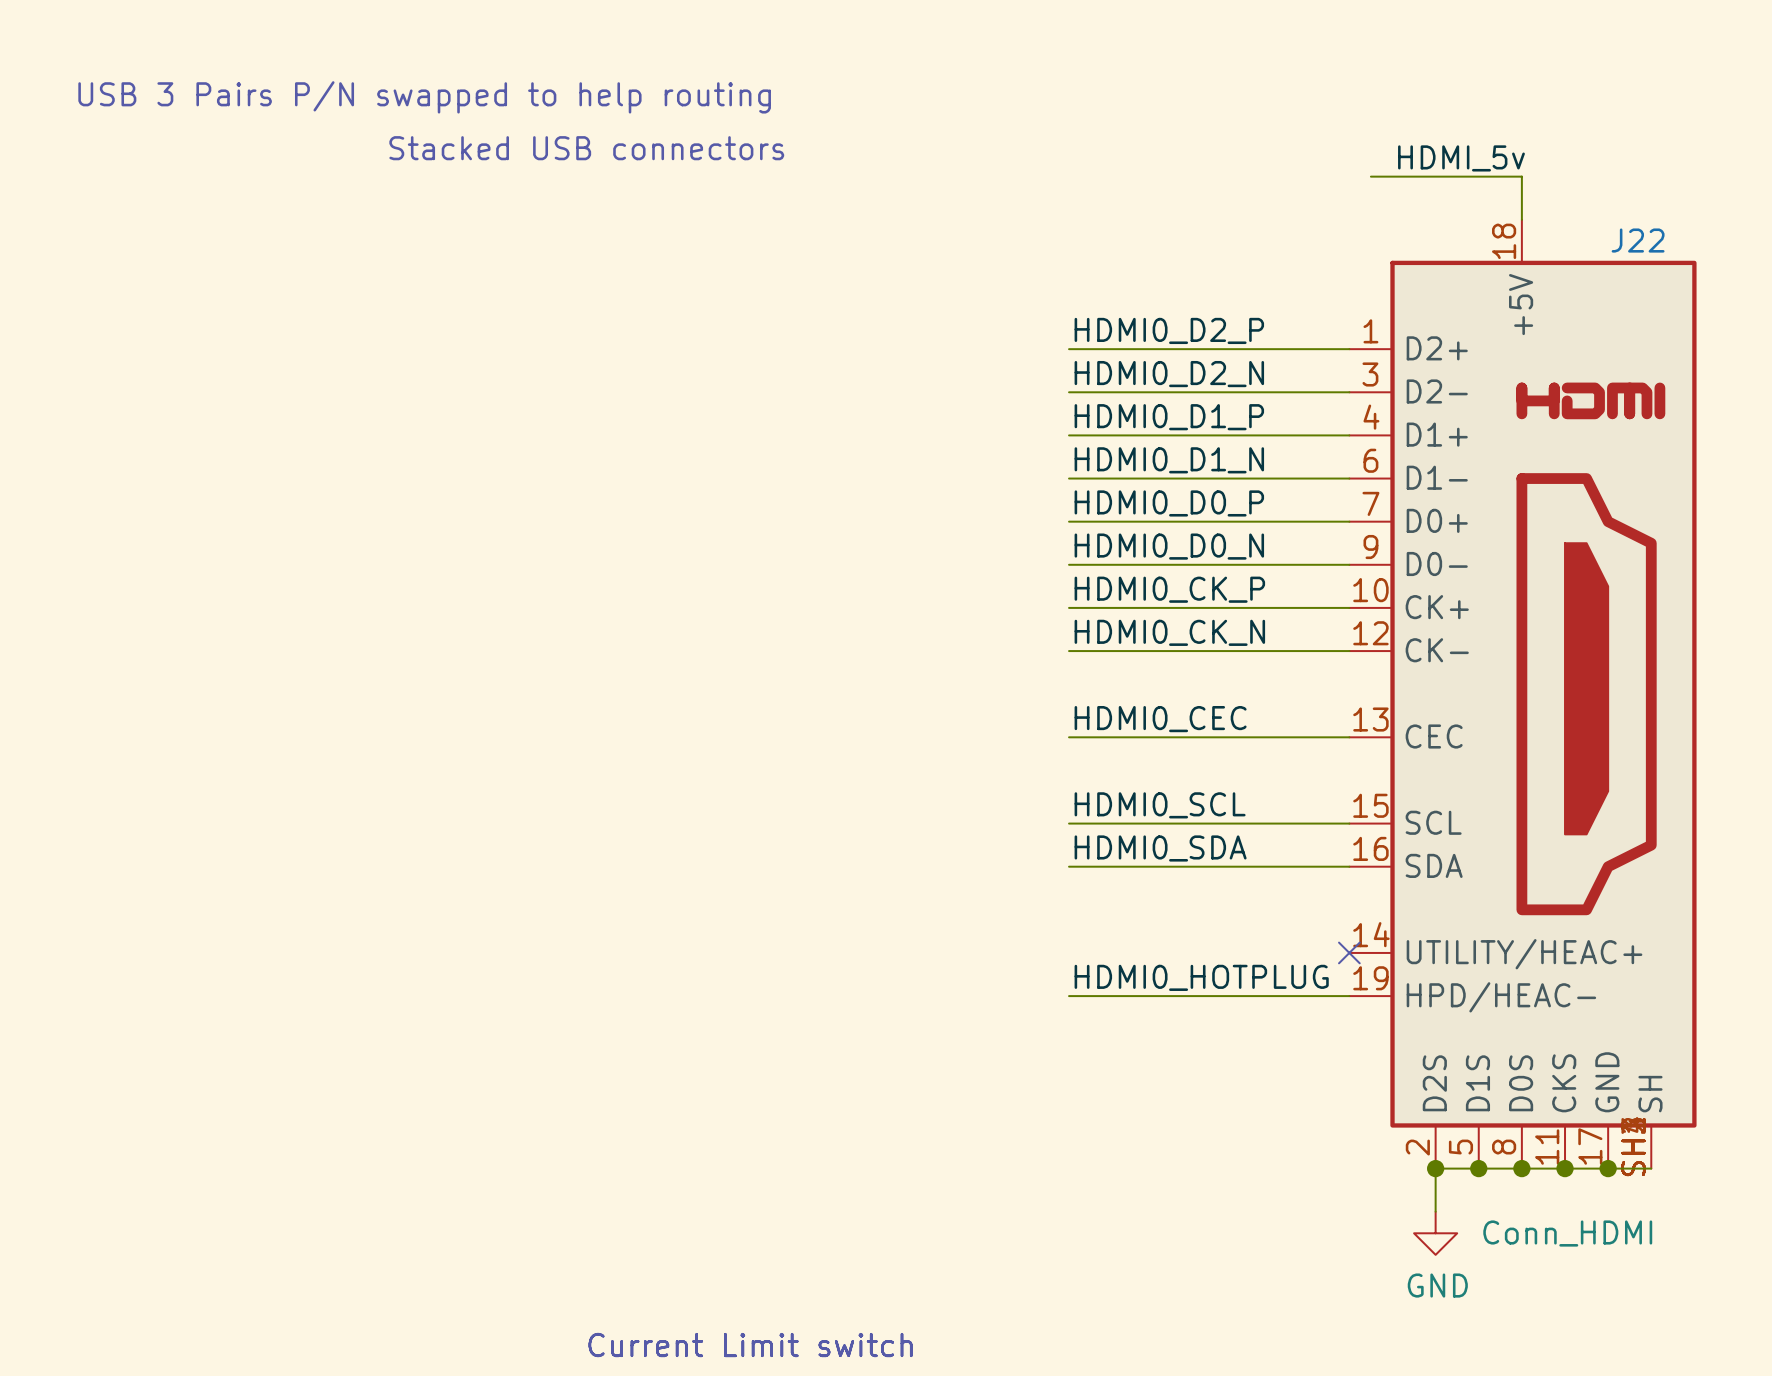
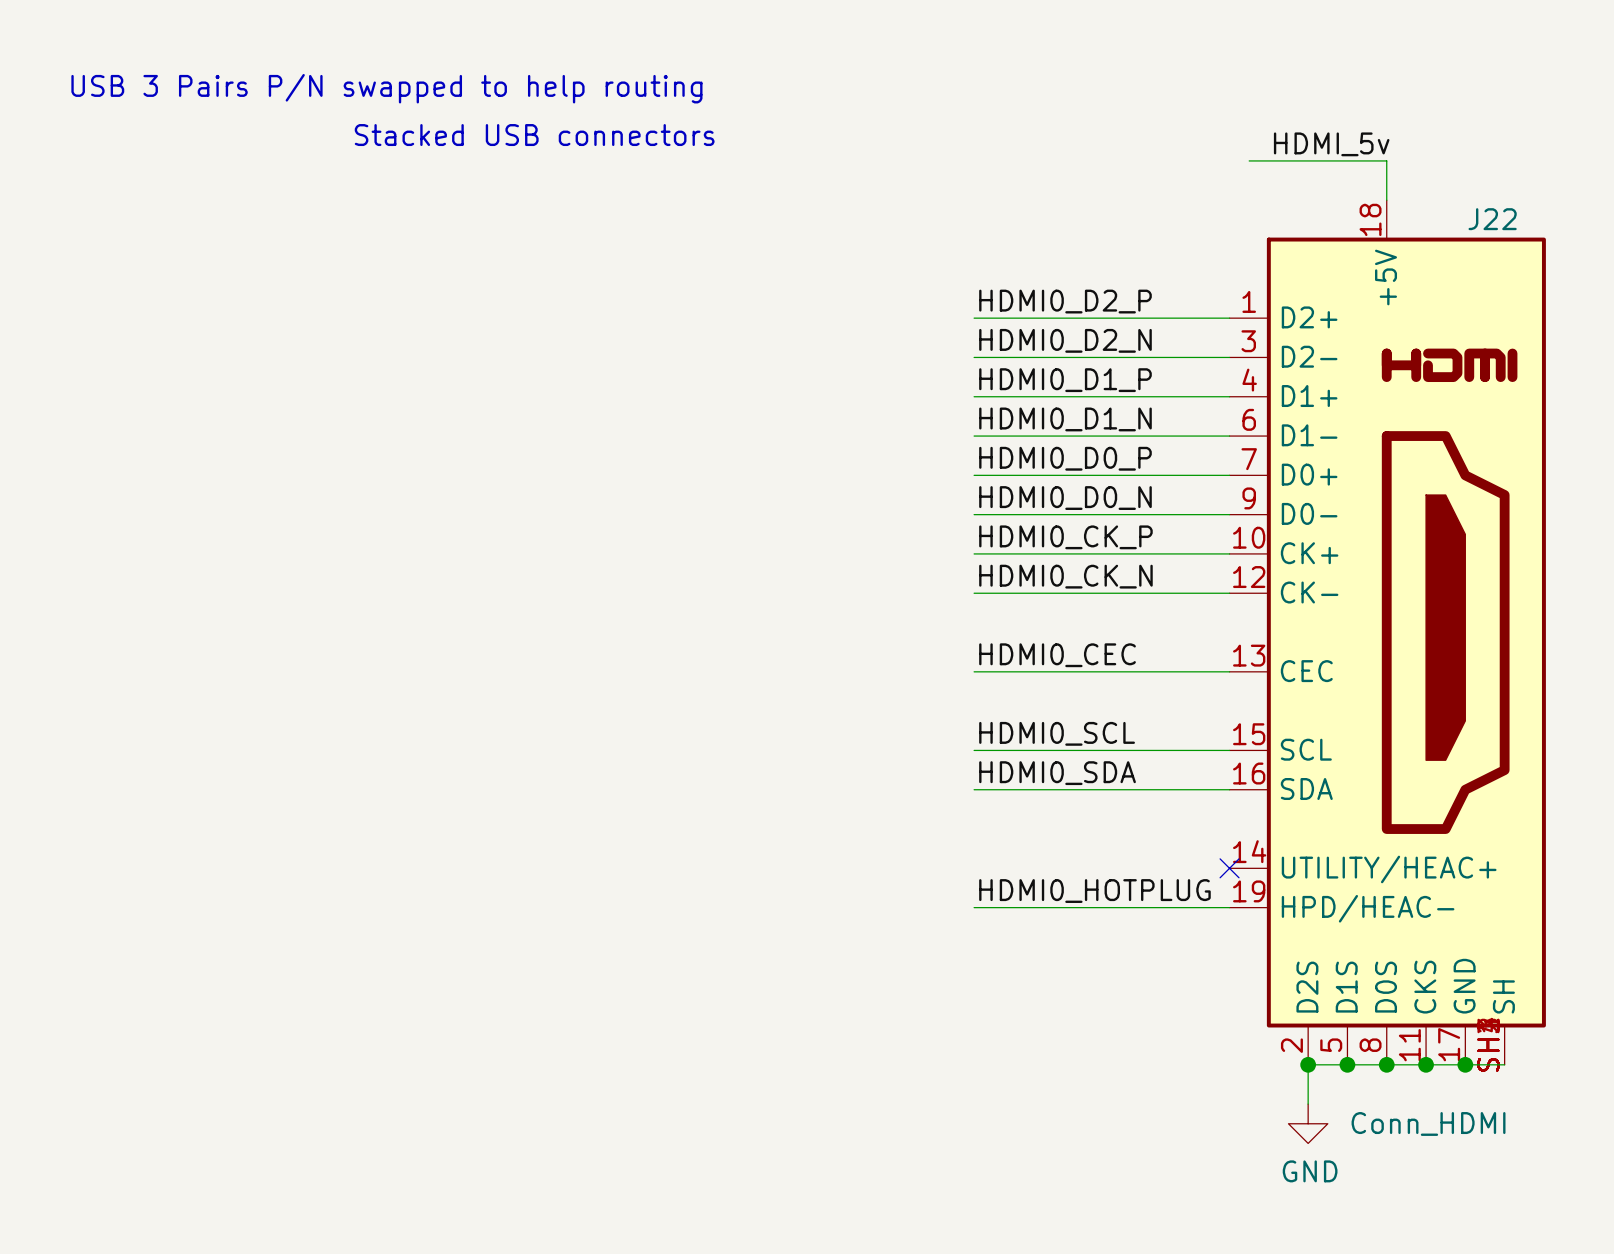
text: Current Limit switch (750, 1345) -> none

